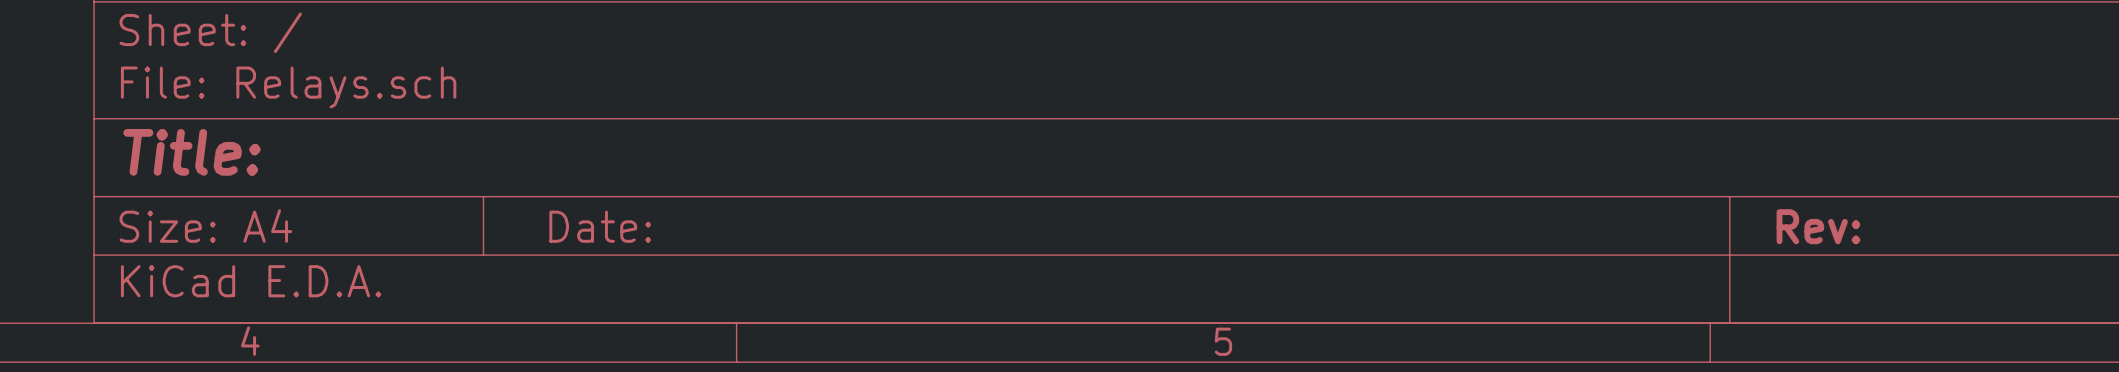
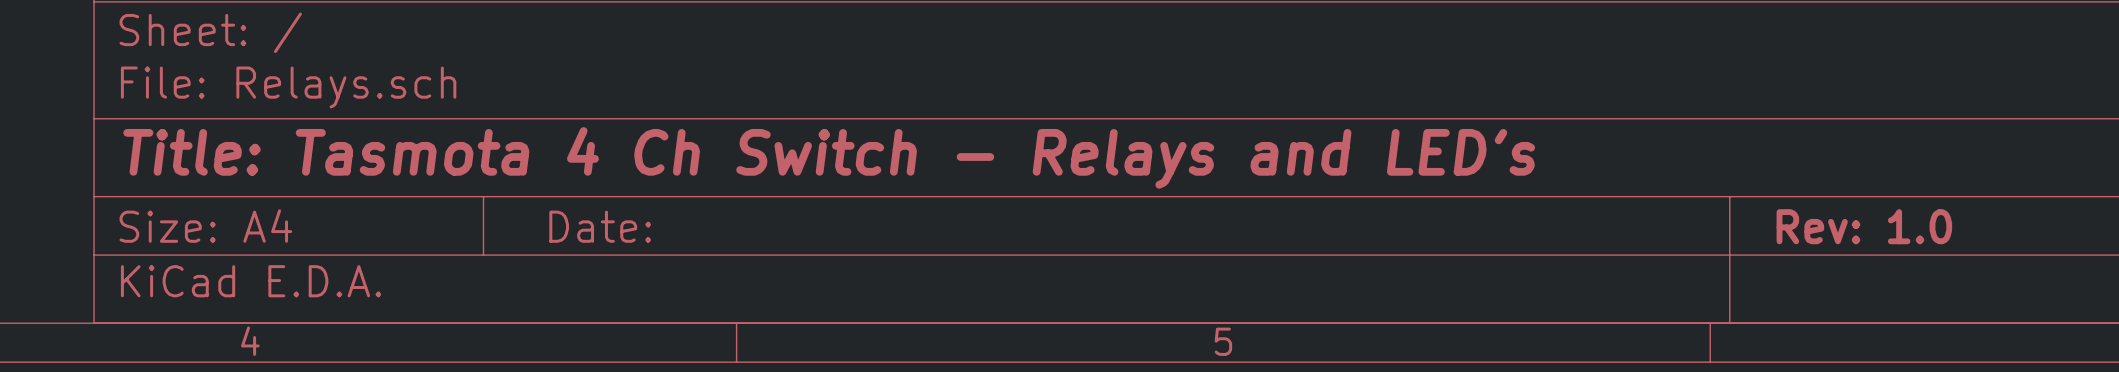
title block: Title: (191, 152) -> Title: Tasmota 4 Ch Switch - Relays and LED's (829, 157)
title block: Rev: (1818, 226) -> Rev: 1.0 (1864, 226)

